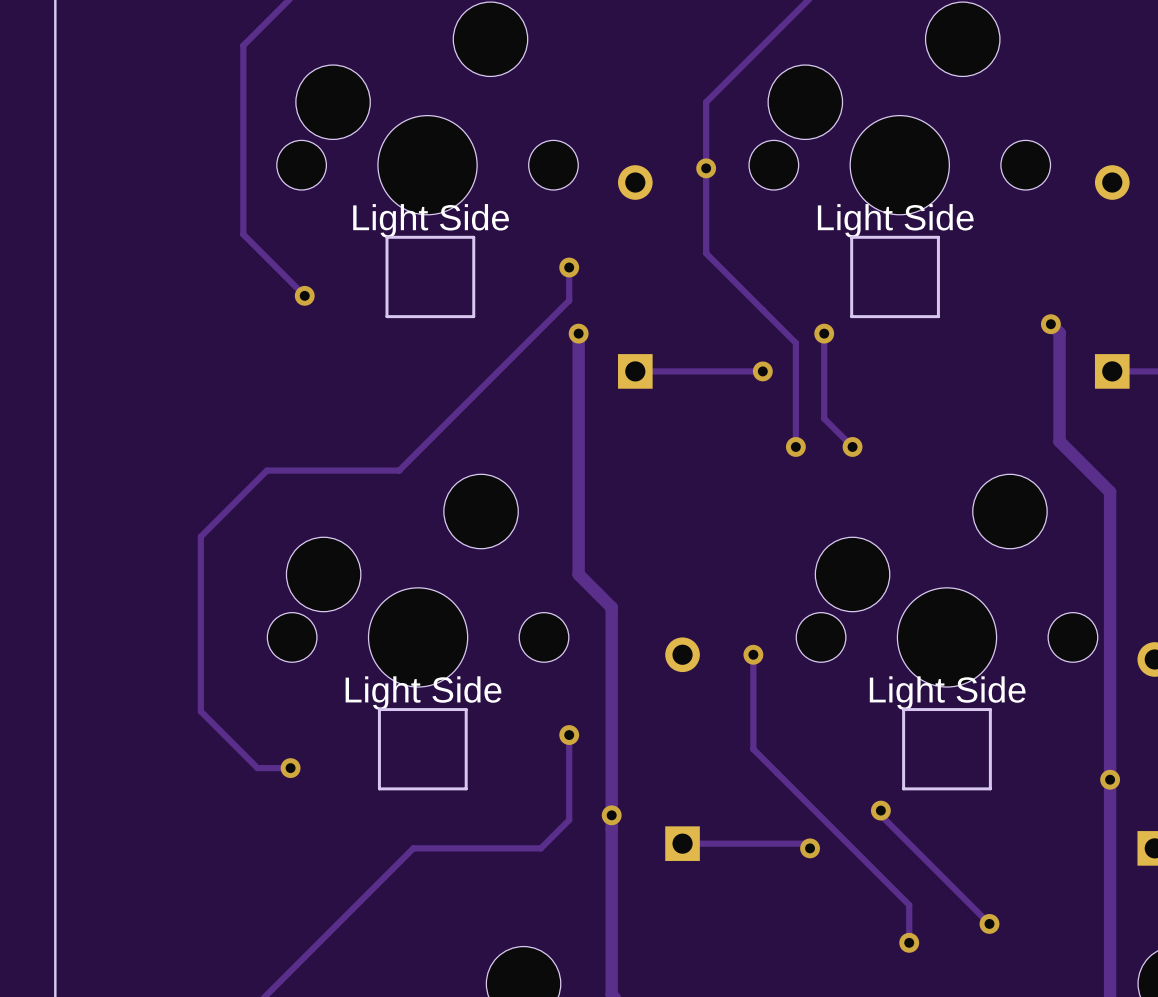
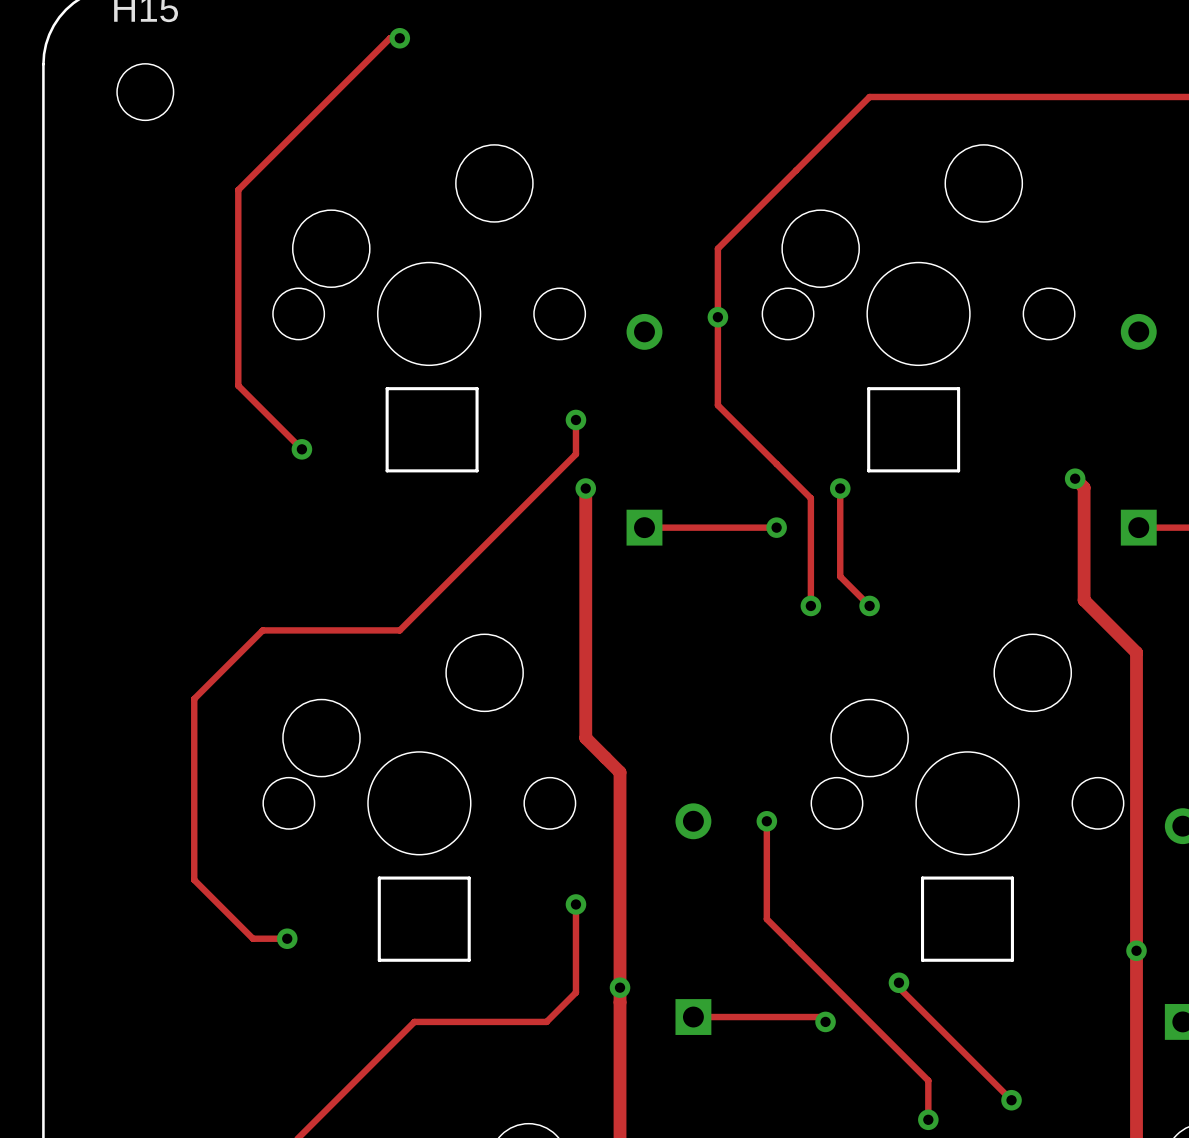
part text: Light Side (431, 220) -> none
part text: Light Side (895, 220) -> none
part text: Light Side (423, 693) -> none
part text: Light Side (947, 693) -> none

